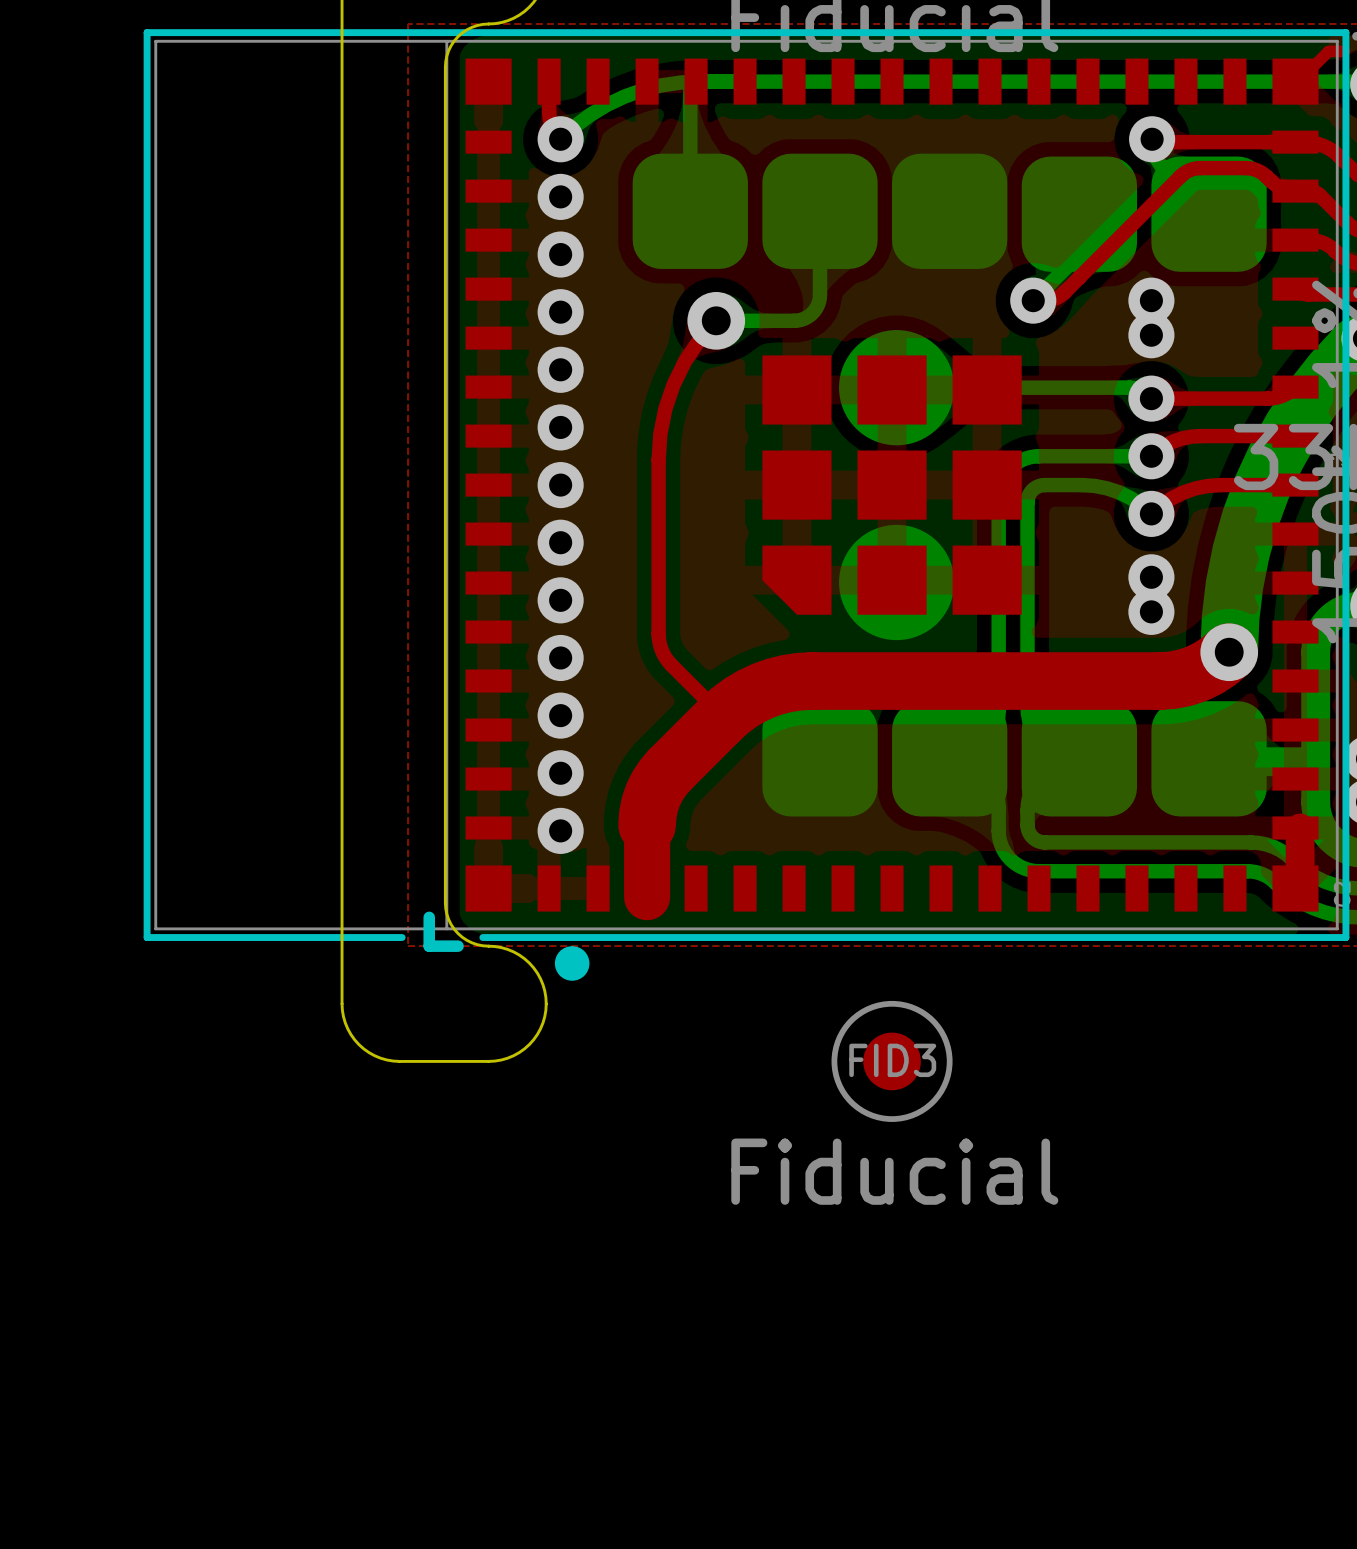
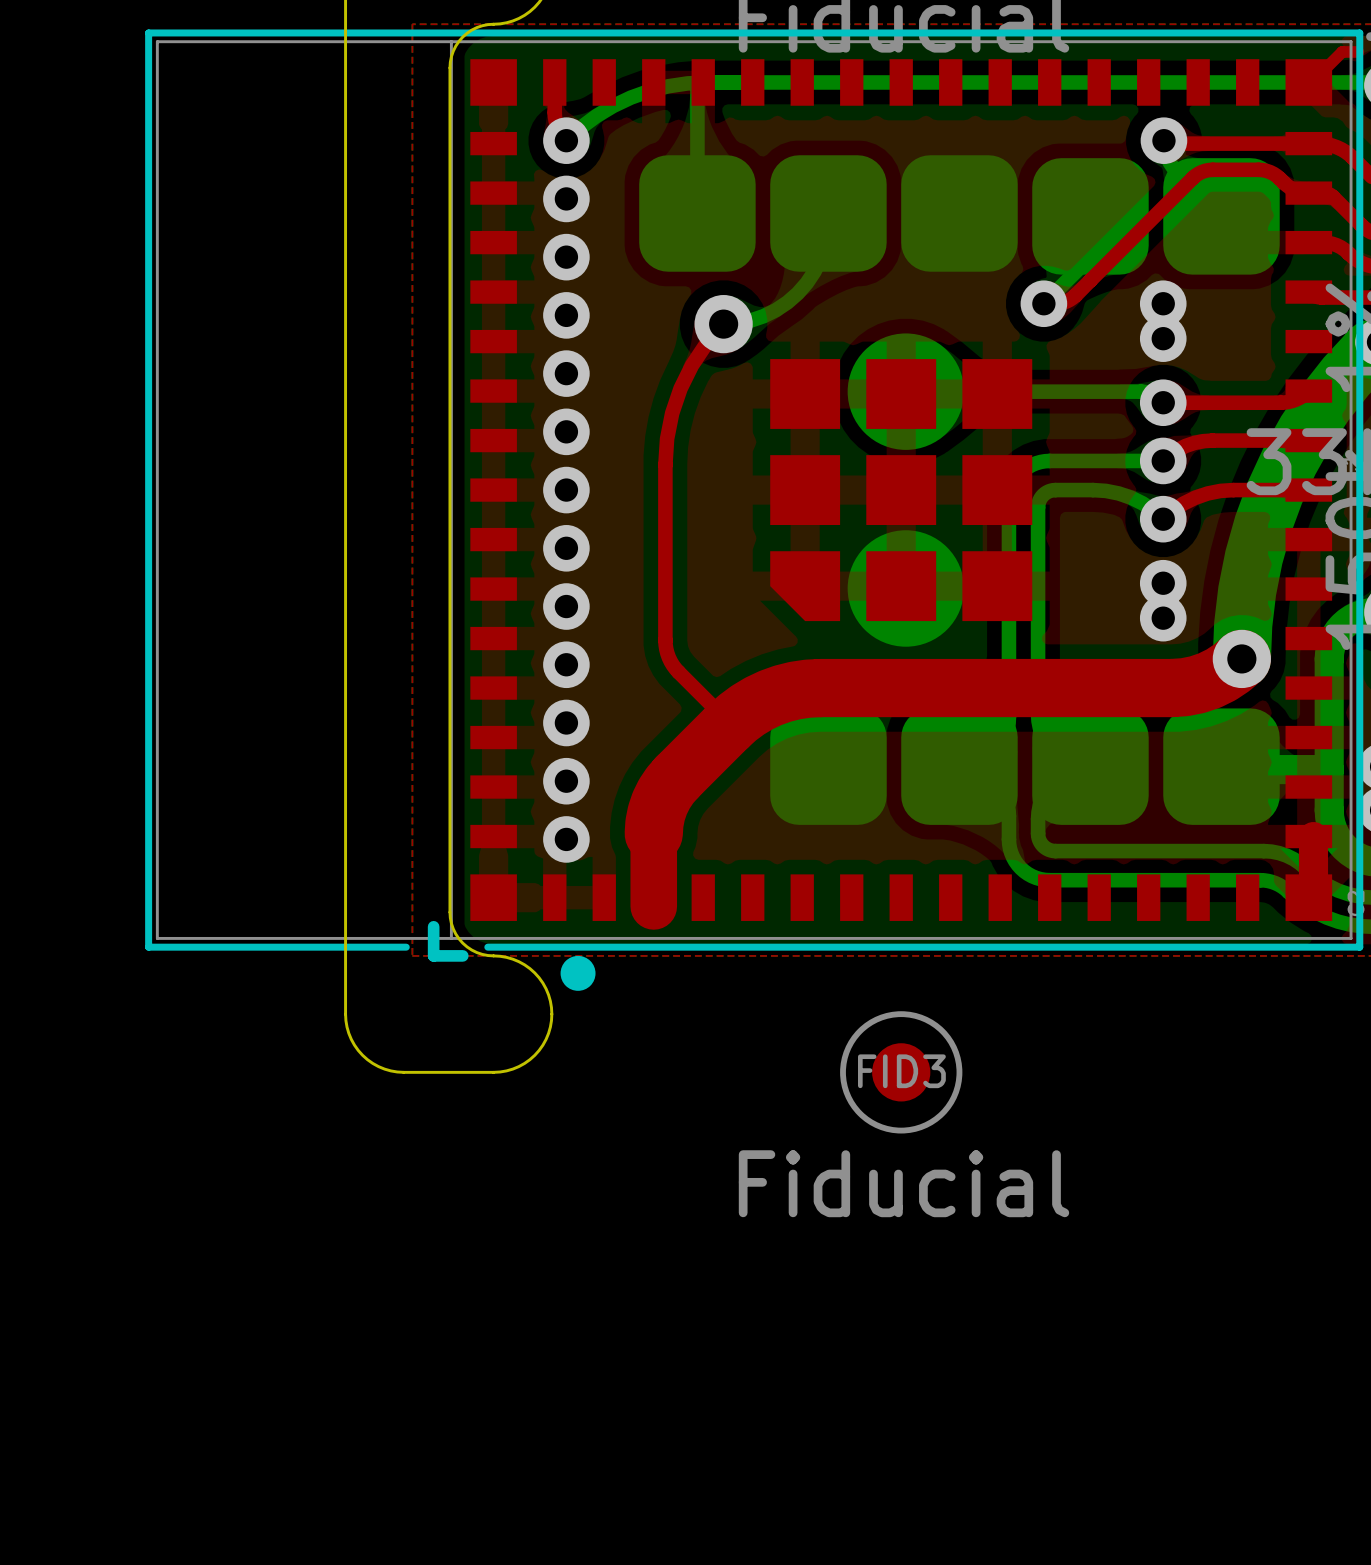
bottom track: (820, 217) (819, 298) (812, 313) (797, 320) (716, 320) -> (828, 219) (827, 232) (820, 259) (814, 271) (797, 293) (776, 310) (763, 316) (750, 320) (723, 324)

